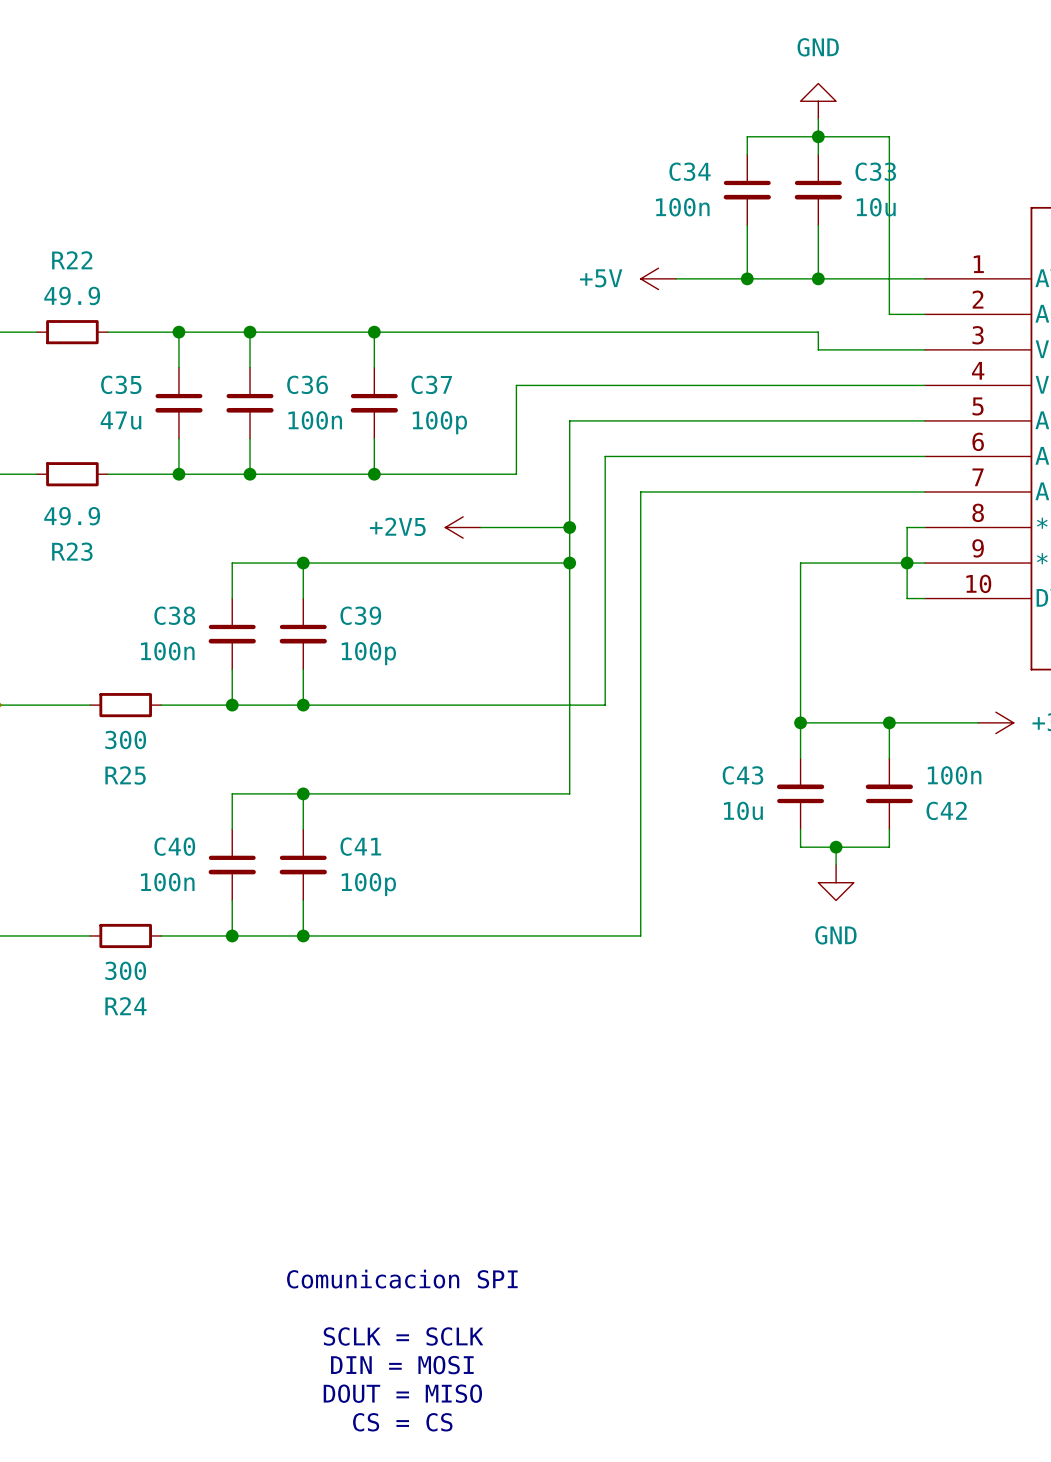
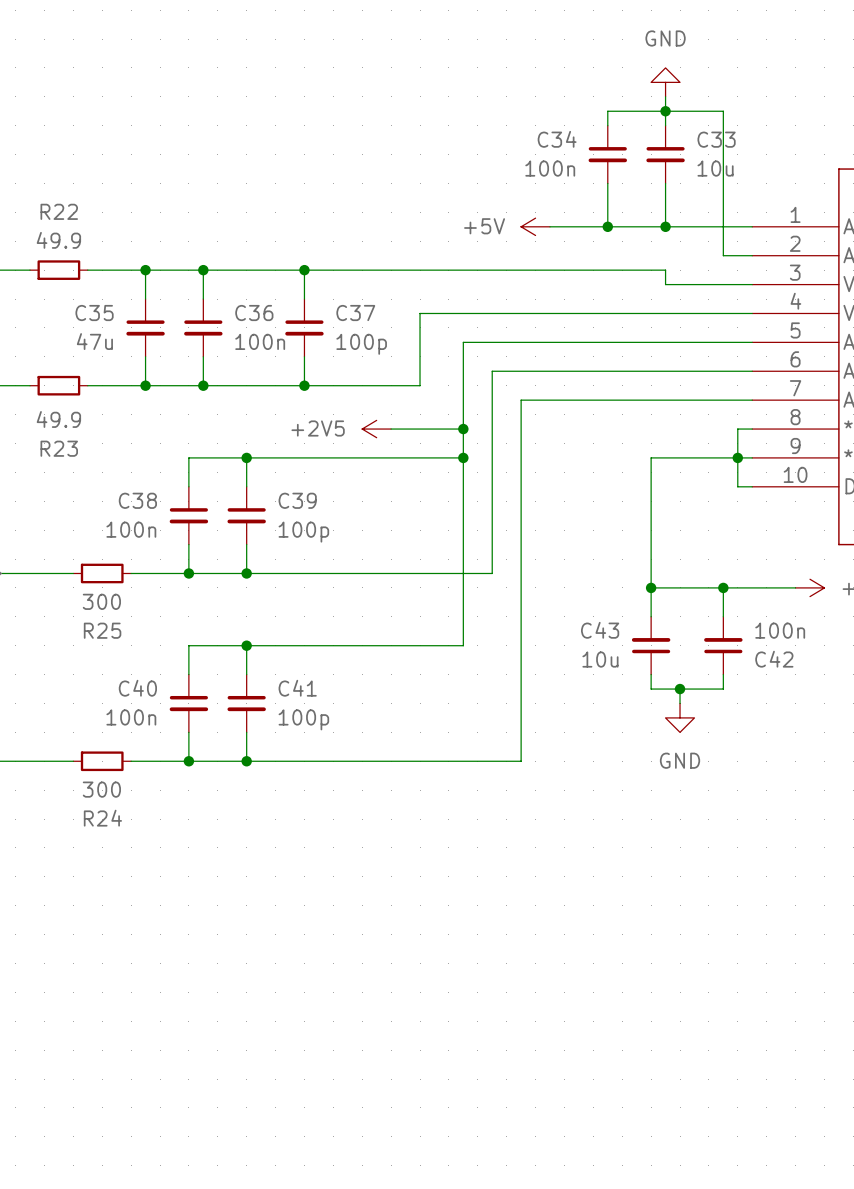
text: Comunicacion SPI (402, 1279) -> none
text: SCLK = SCLK (403, 1336) -> none
text: DIN = MOSI (402, 1365) -> none
text: DOUT = MISO (402, 1393) -> none
text: CS = CS (402, 1422) -> none

